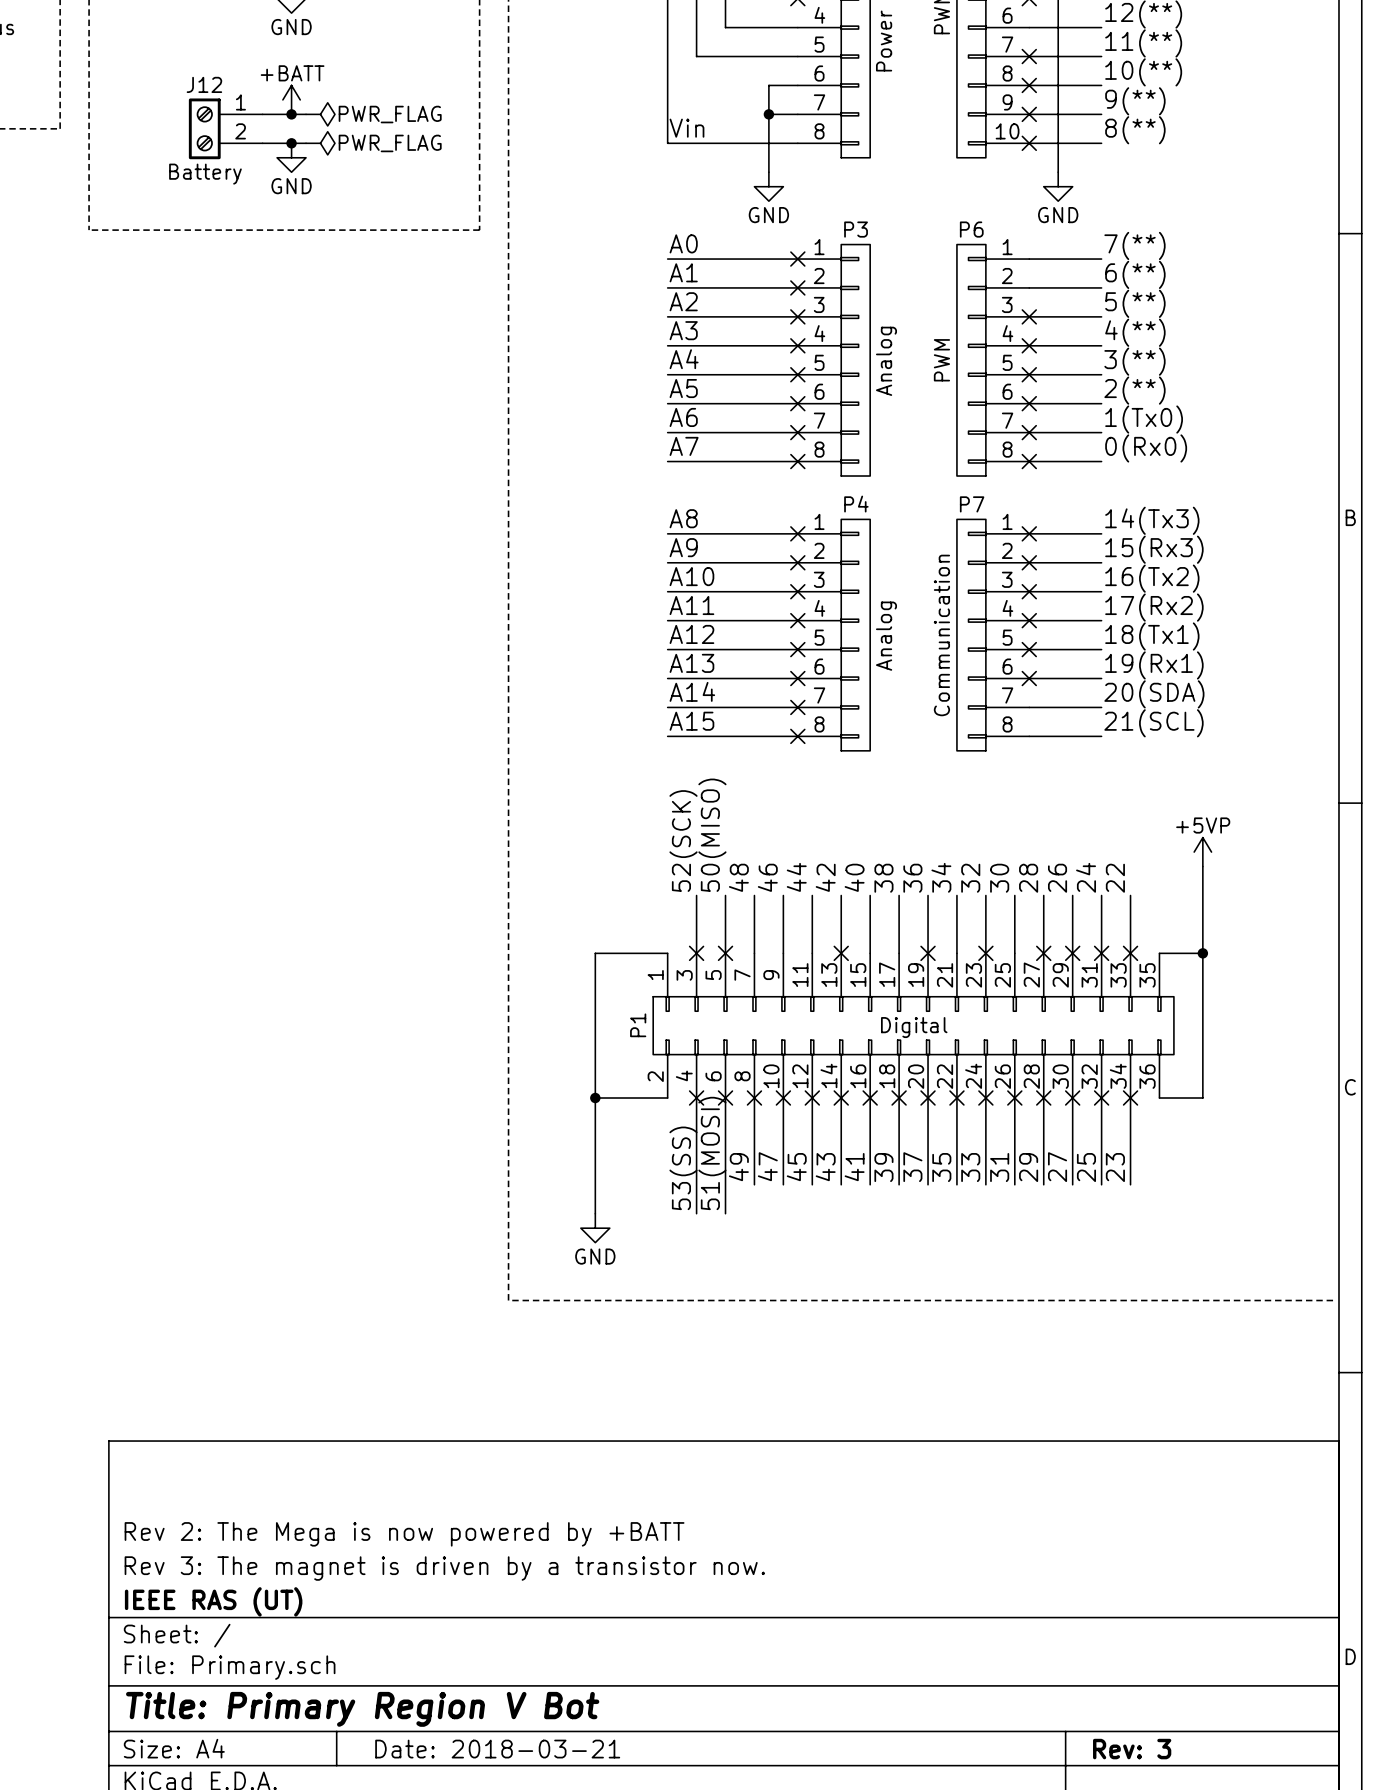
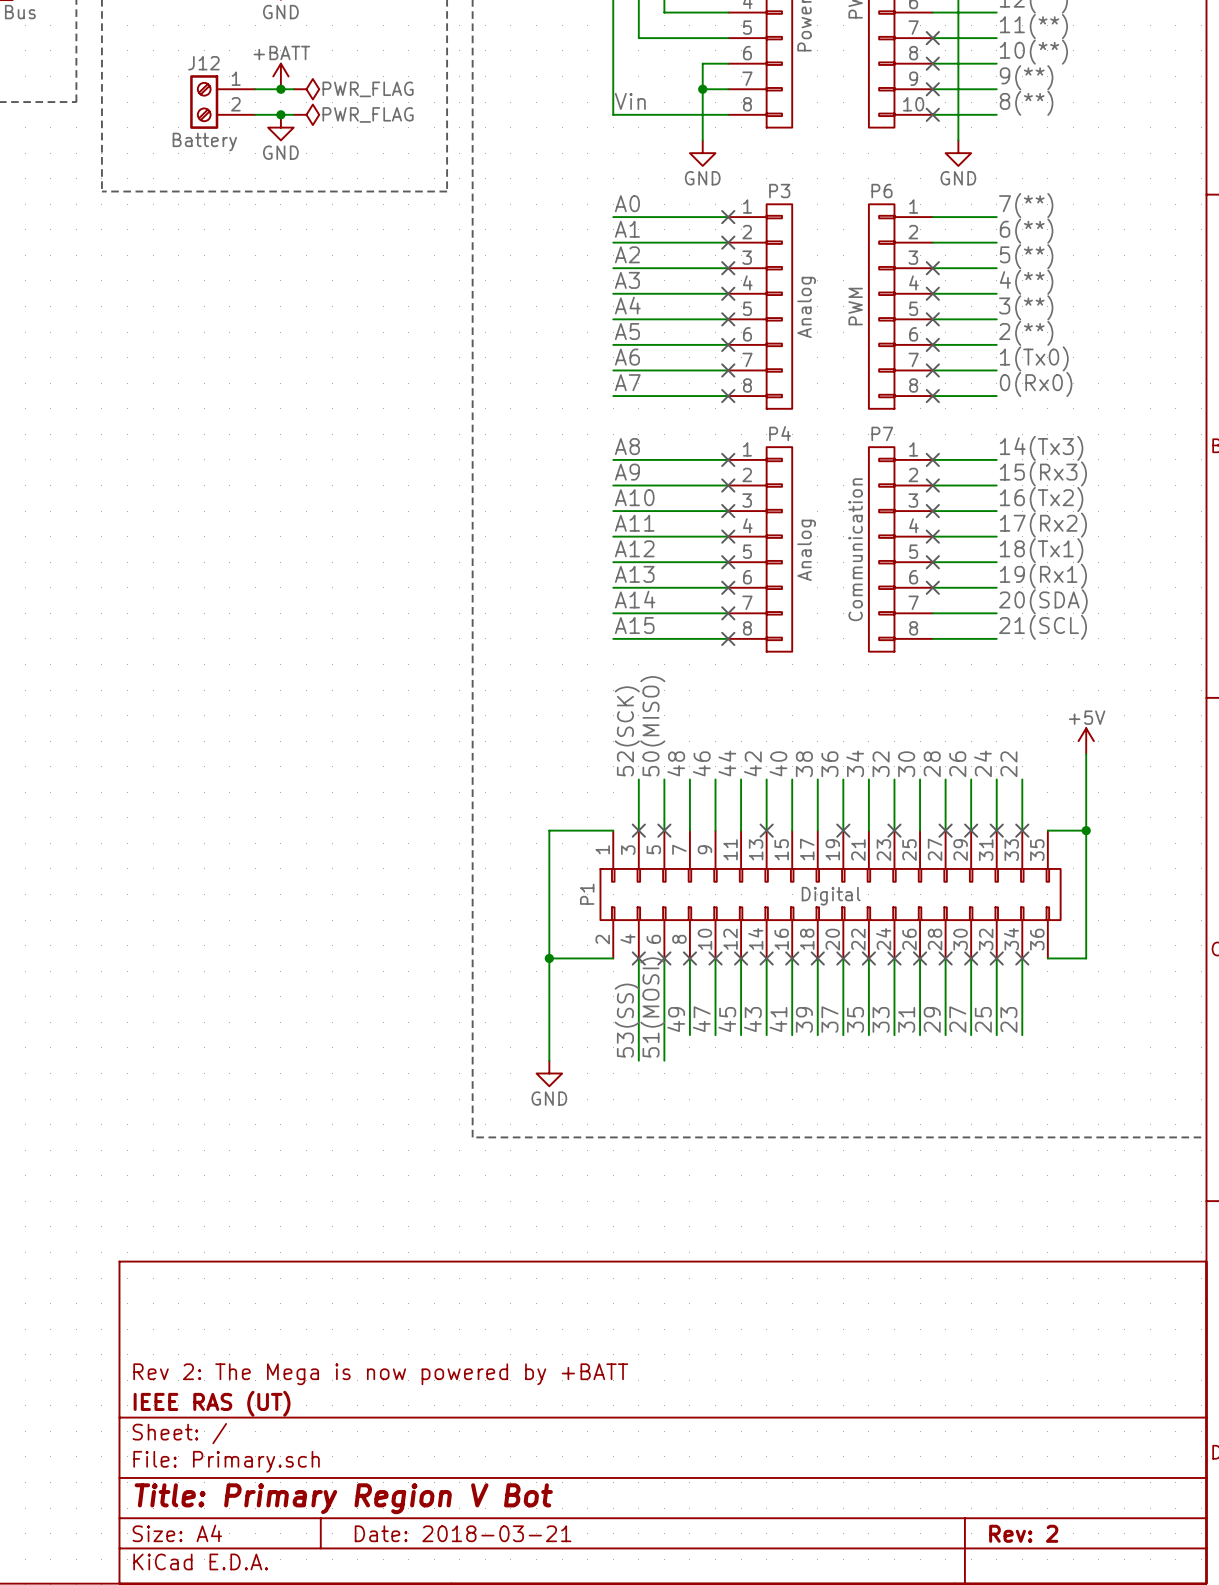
power symbol: +5VP (1202, 852) -> +5V (1086, 741)
title block: Rev 2: The Mega is now powered by +BATT (404, 1534) -> none
title block: Rev 3: The magnet is driven by a transistor now. (444, 1568) -> Rev 2: The Mega is now powered by +BATT (380, 1374)
title block: Rev: 3 (1132, 1749) -> Rev: 2 (1023, 1533)

